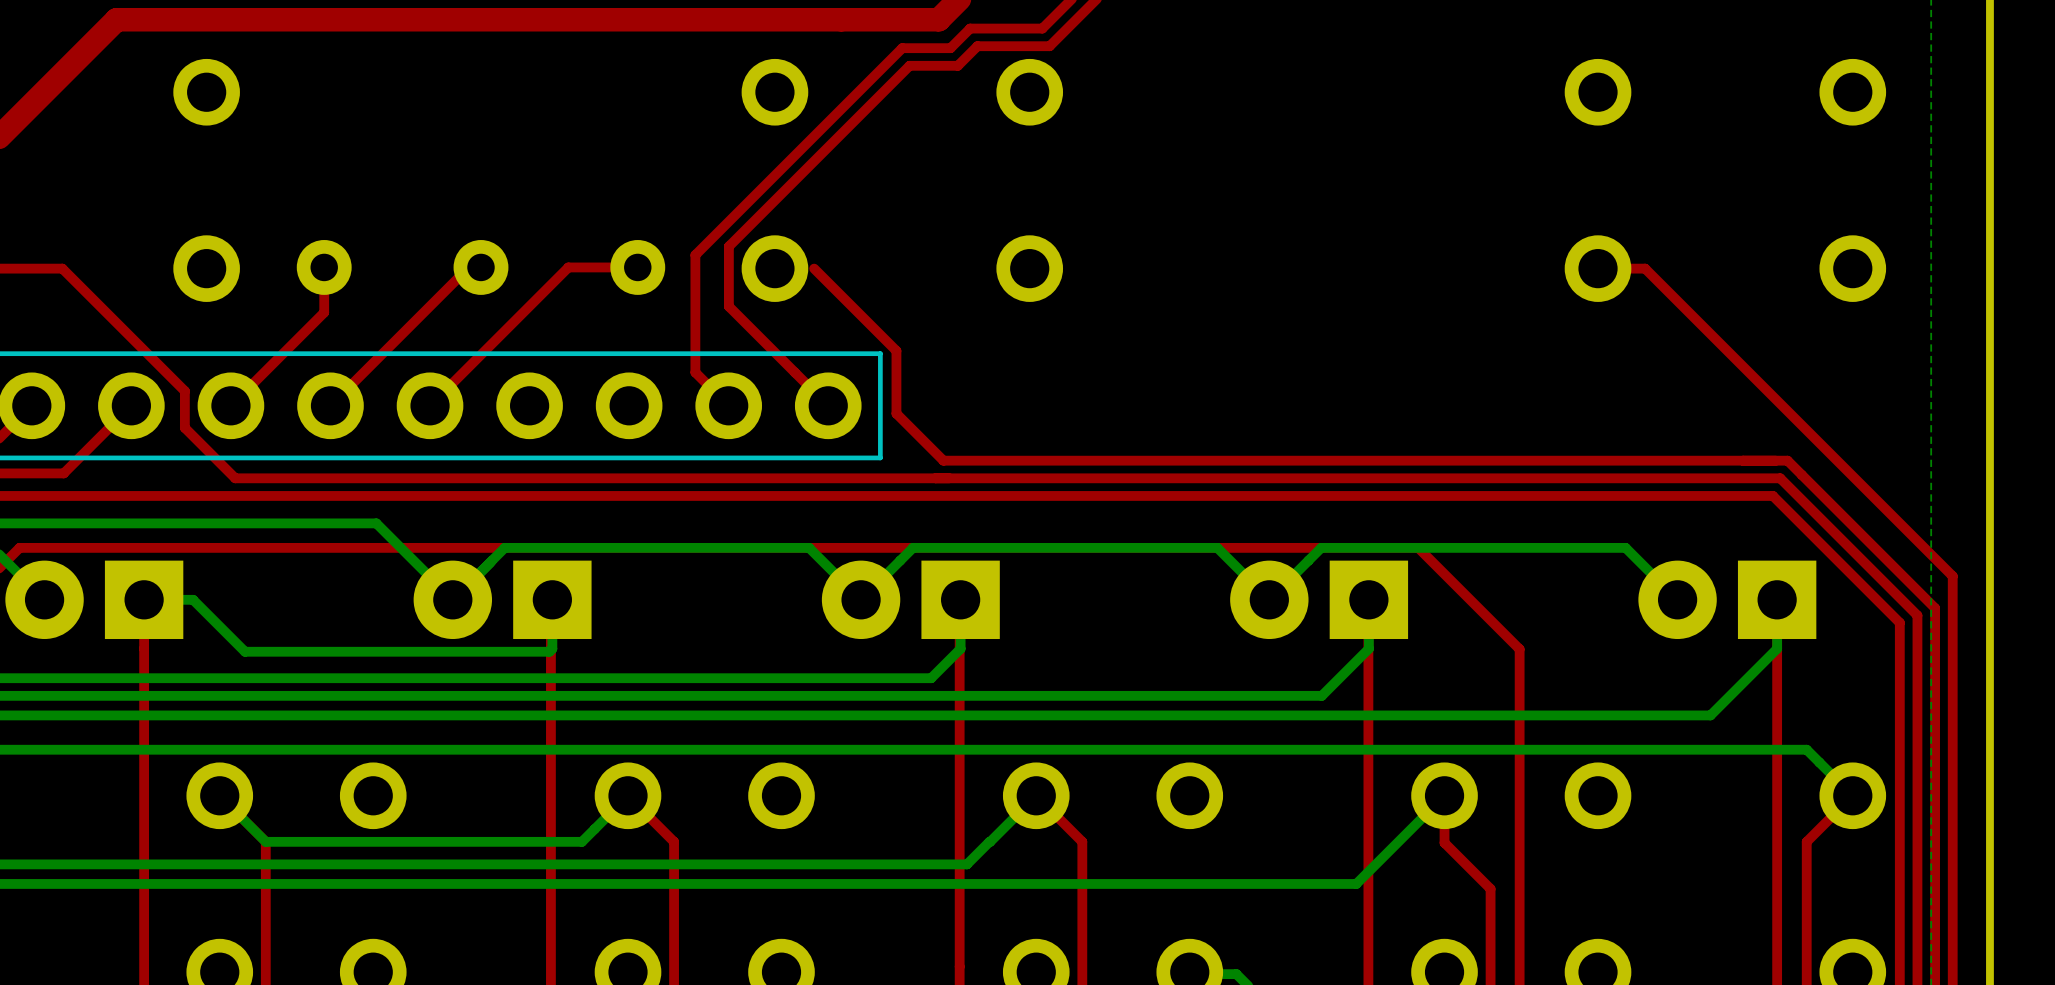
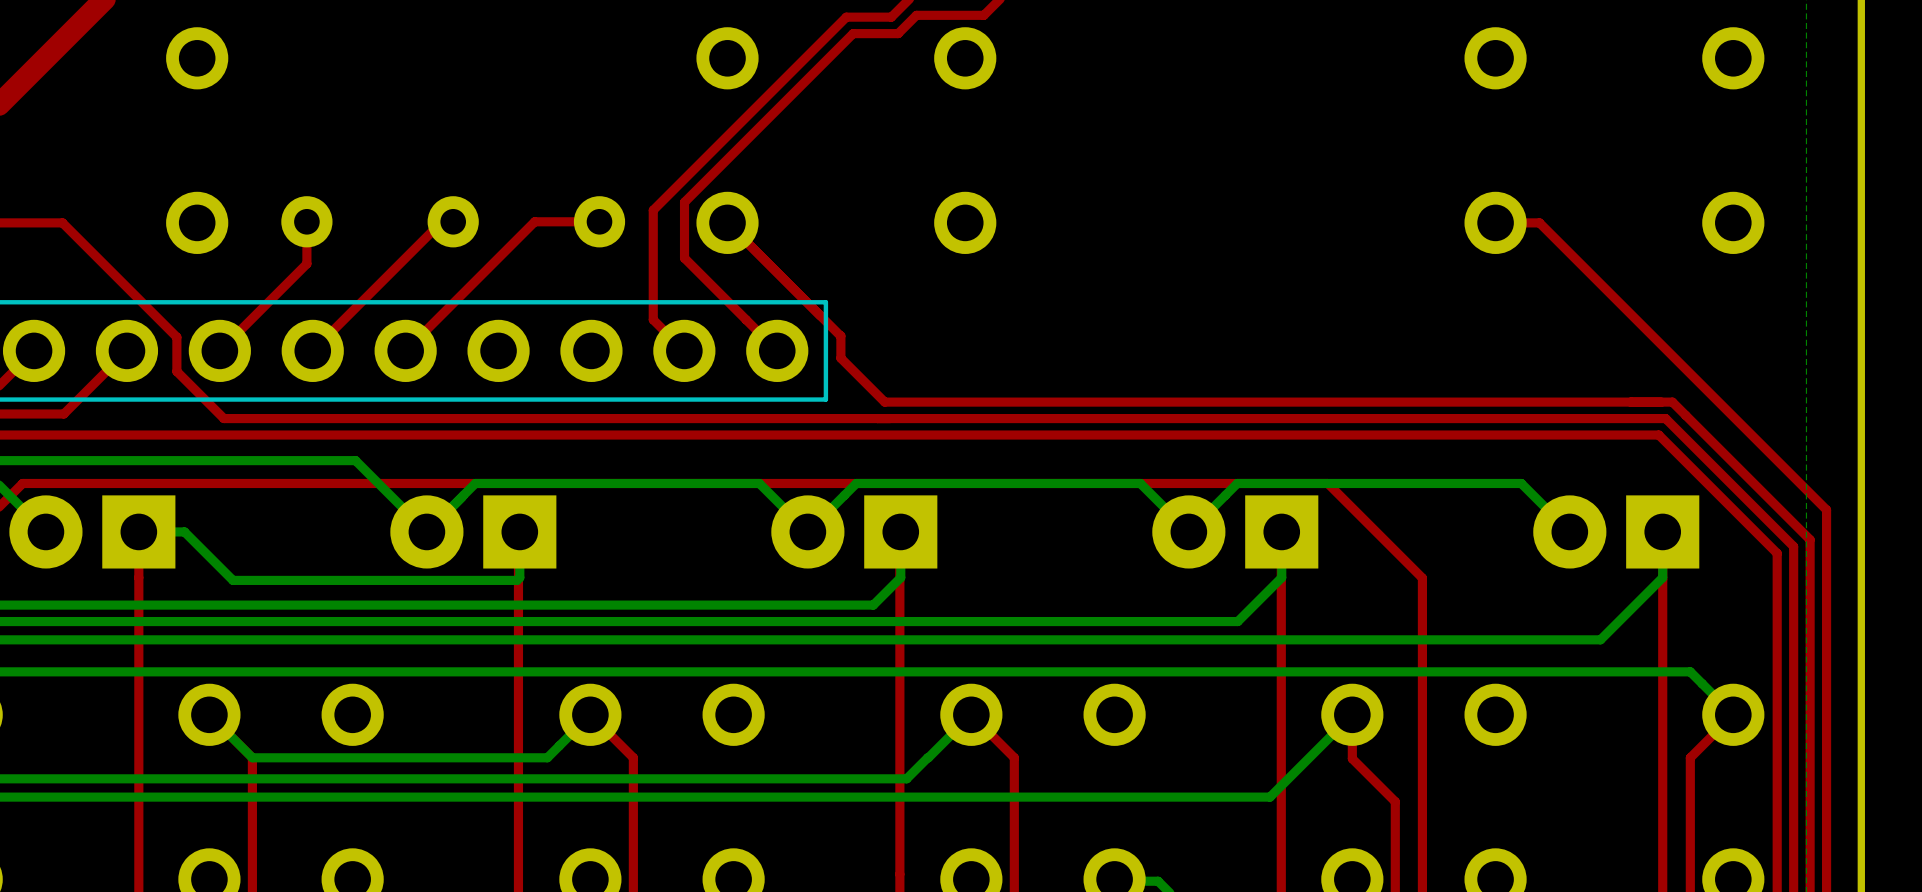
top track: (814, 268) (896, 350) (896, 389) -> (727, 222) (840, 335)

